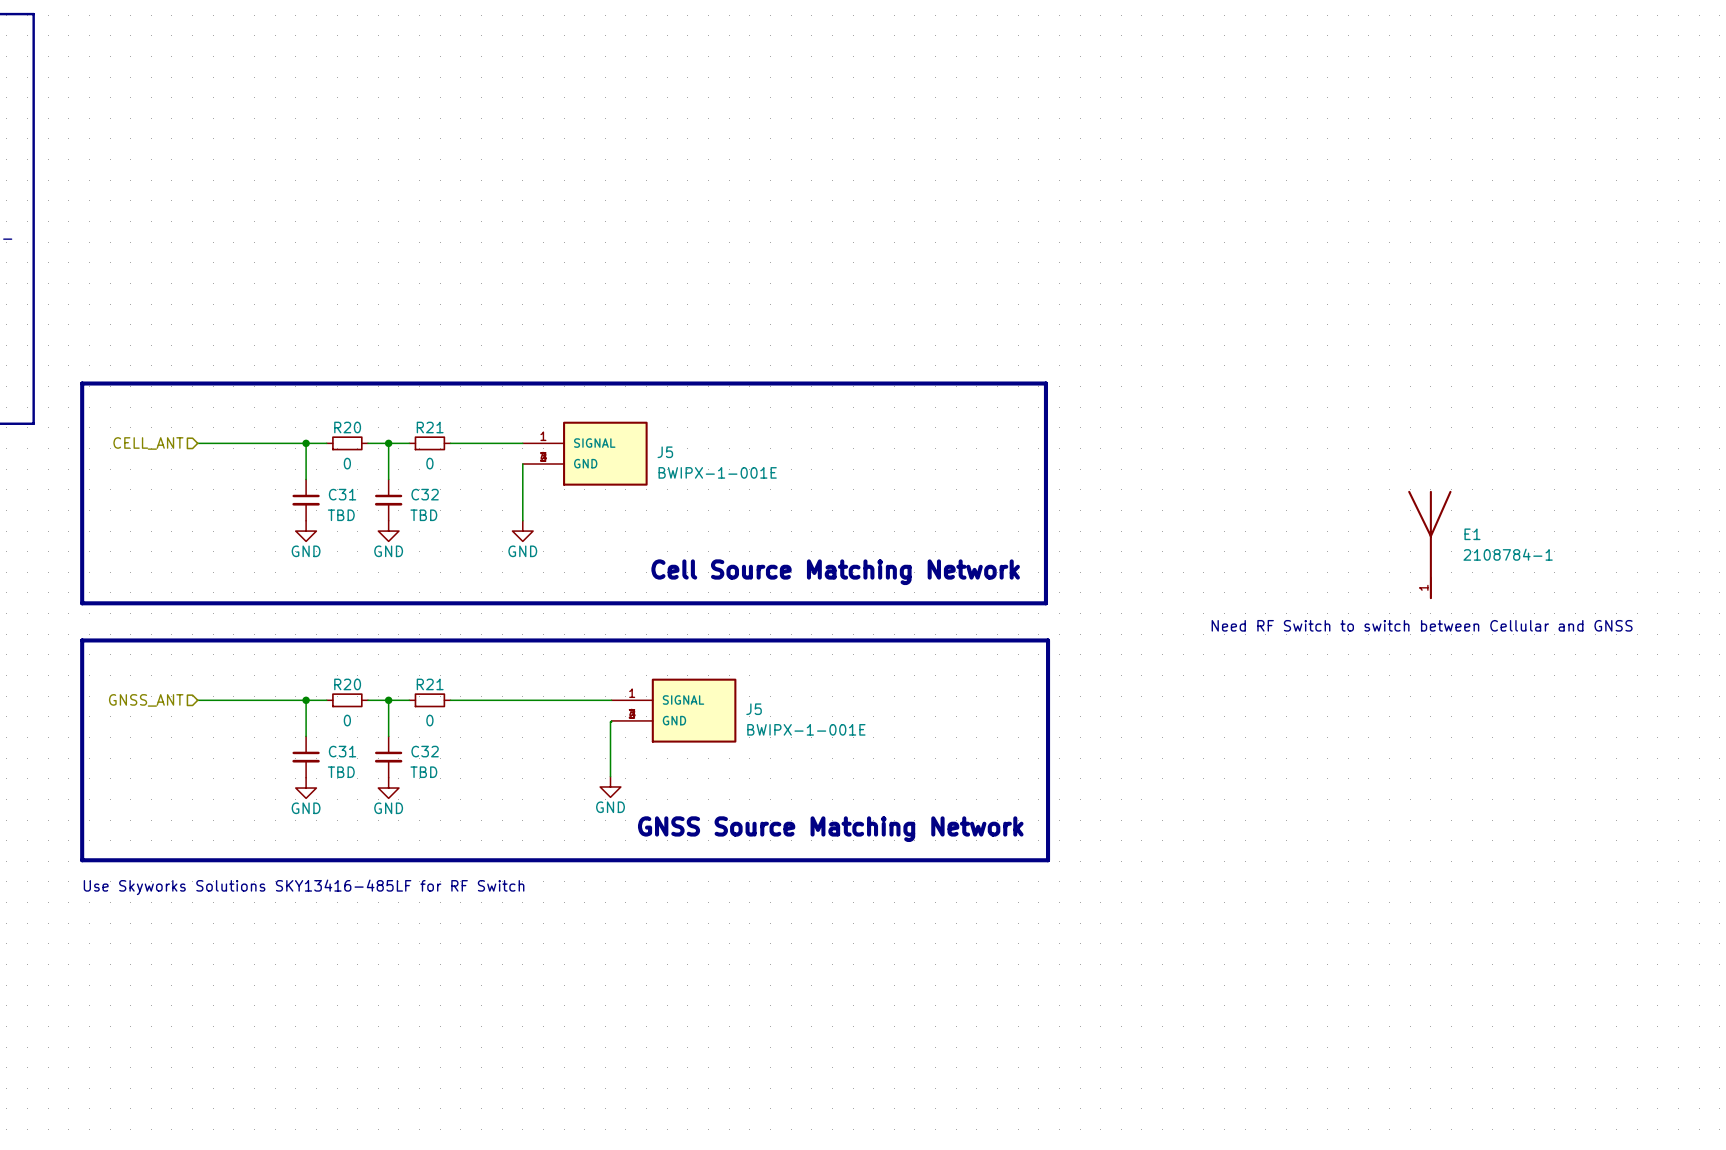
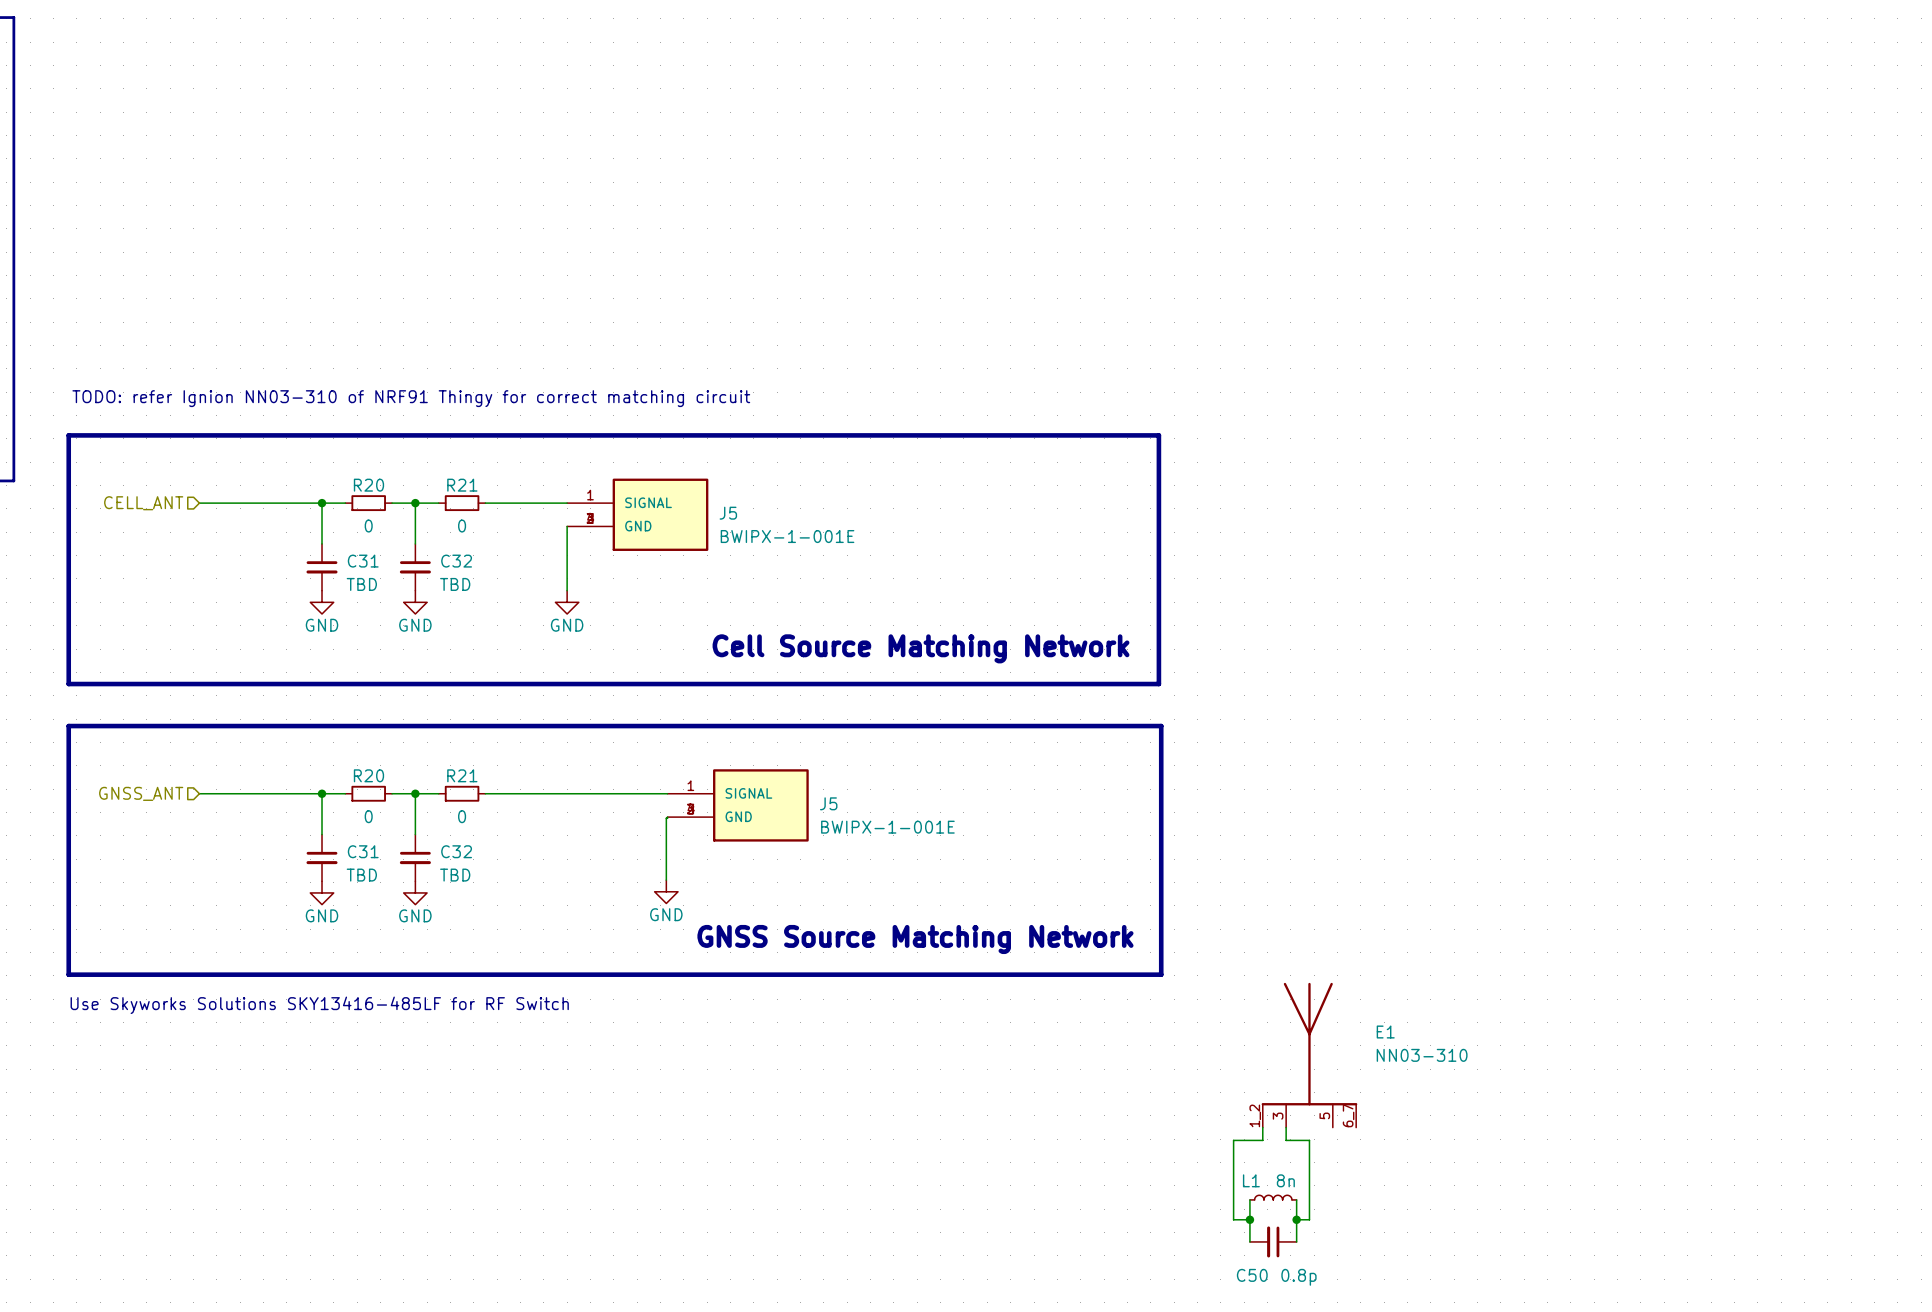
text: none -> TODO: refer Ignion NN03-310 of NRF91 Thingy for correct matching circuit (411, 398)
E1 symbol: [1408, 490, 1452, 600] -> [1261, 982, 1358, 1128]
E1 name position: E1 (1472, 534) -> E1 (1385, 1032)
E1 value: 2108784-1 (1508, 554) -> NN03-310 (1422, 1055)
text: Need RF Switch to switch between Cellular and GNSS (1422, 625) -> none
wire: none -> (1262, 1127) (1262, 1140) (1233, 1140) (1233, 1219) (1249, 1219)
wire: none -> (1286, 1127) (1286, 1140) (1309, 1140) (1309, 1219) (1296, 1219)
L1: none -> 8n (1273, 1197)
wire: none -> (1249, 1199) (1249, 1241)
wire: none -> (1296, 1199) (1296, 1241)
junction: none -> (1249, 1219)
junction: none -> (1296, 1219)
C50: none -> 0.8p (1273, 1241)

